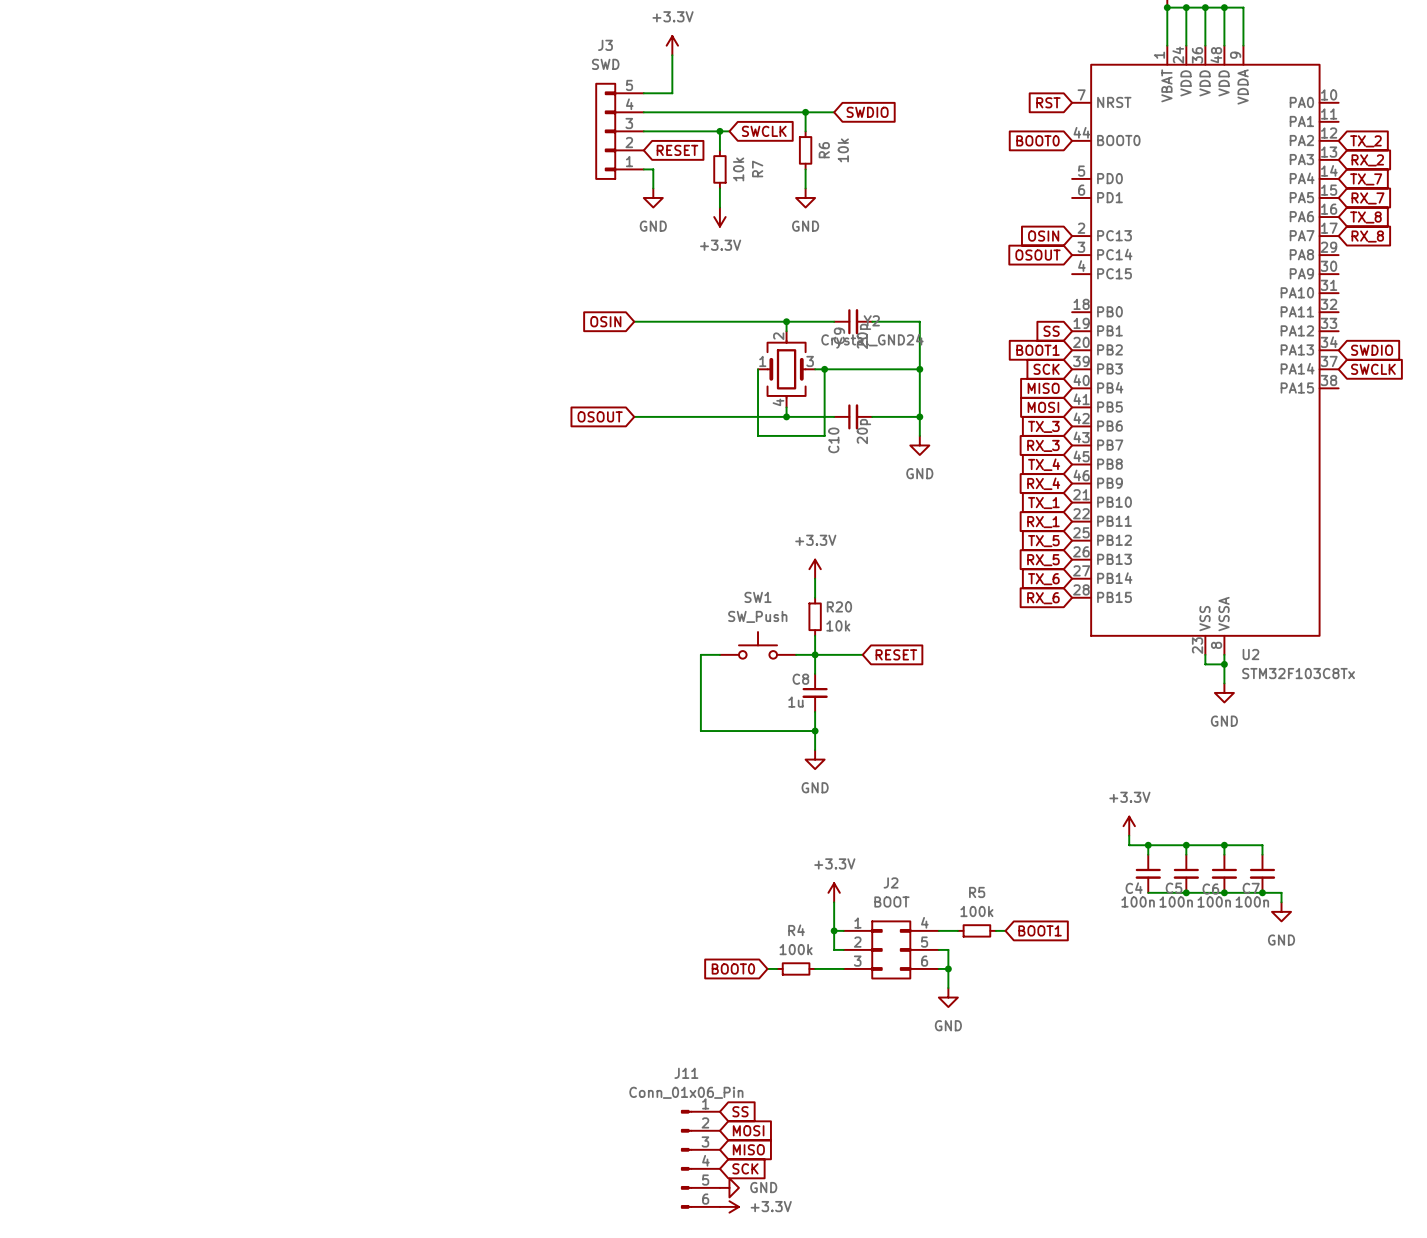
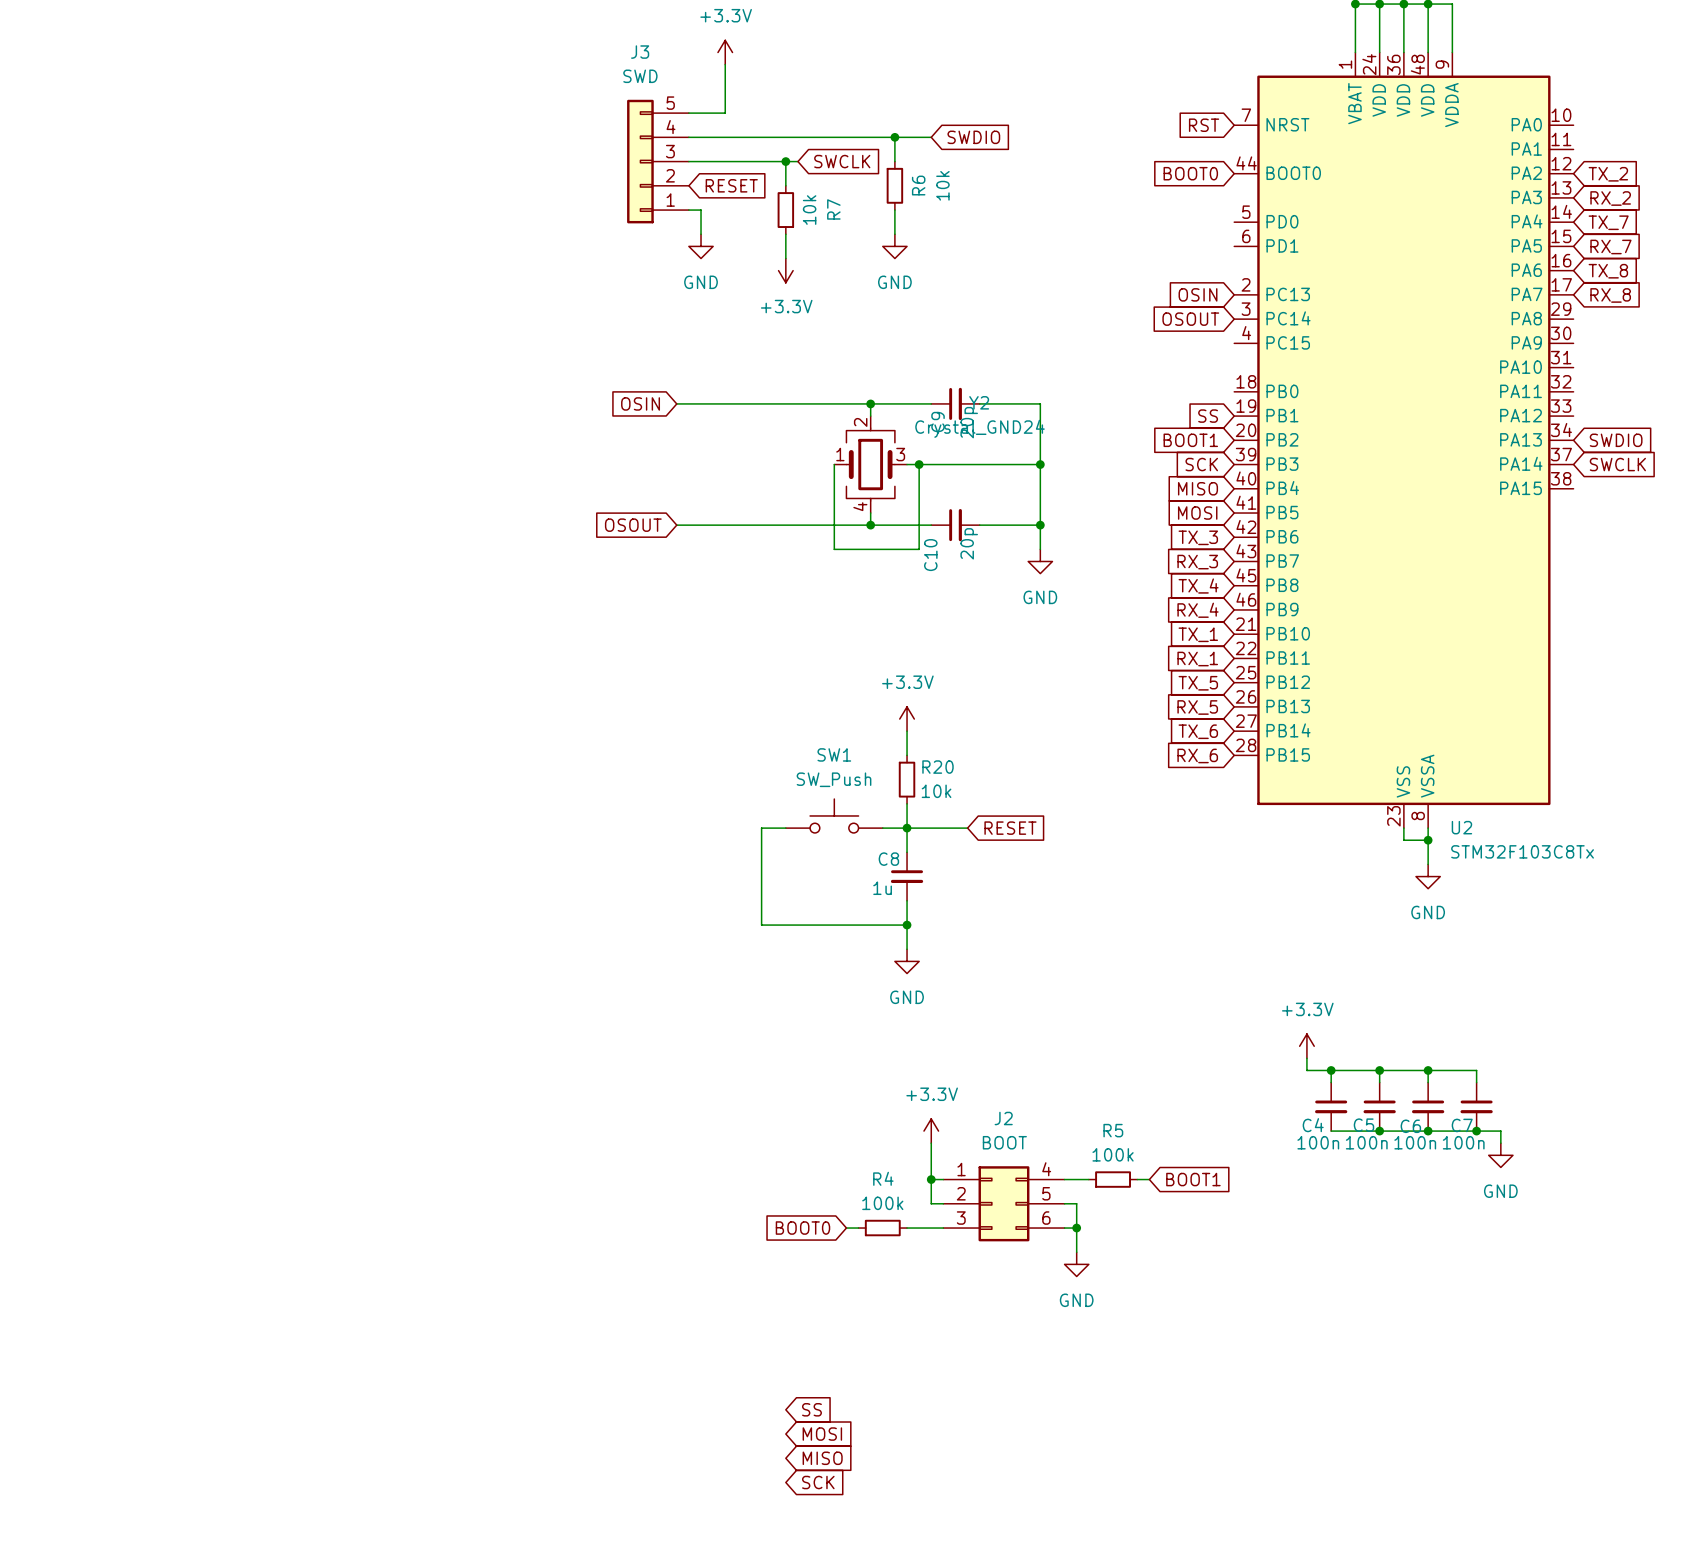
J11: Conn_01x06_Pin (700, 1159) -> none
power symbol: GND (729, 1187) -> none
power symbol: +3.3V (729, 1206) -> none

